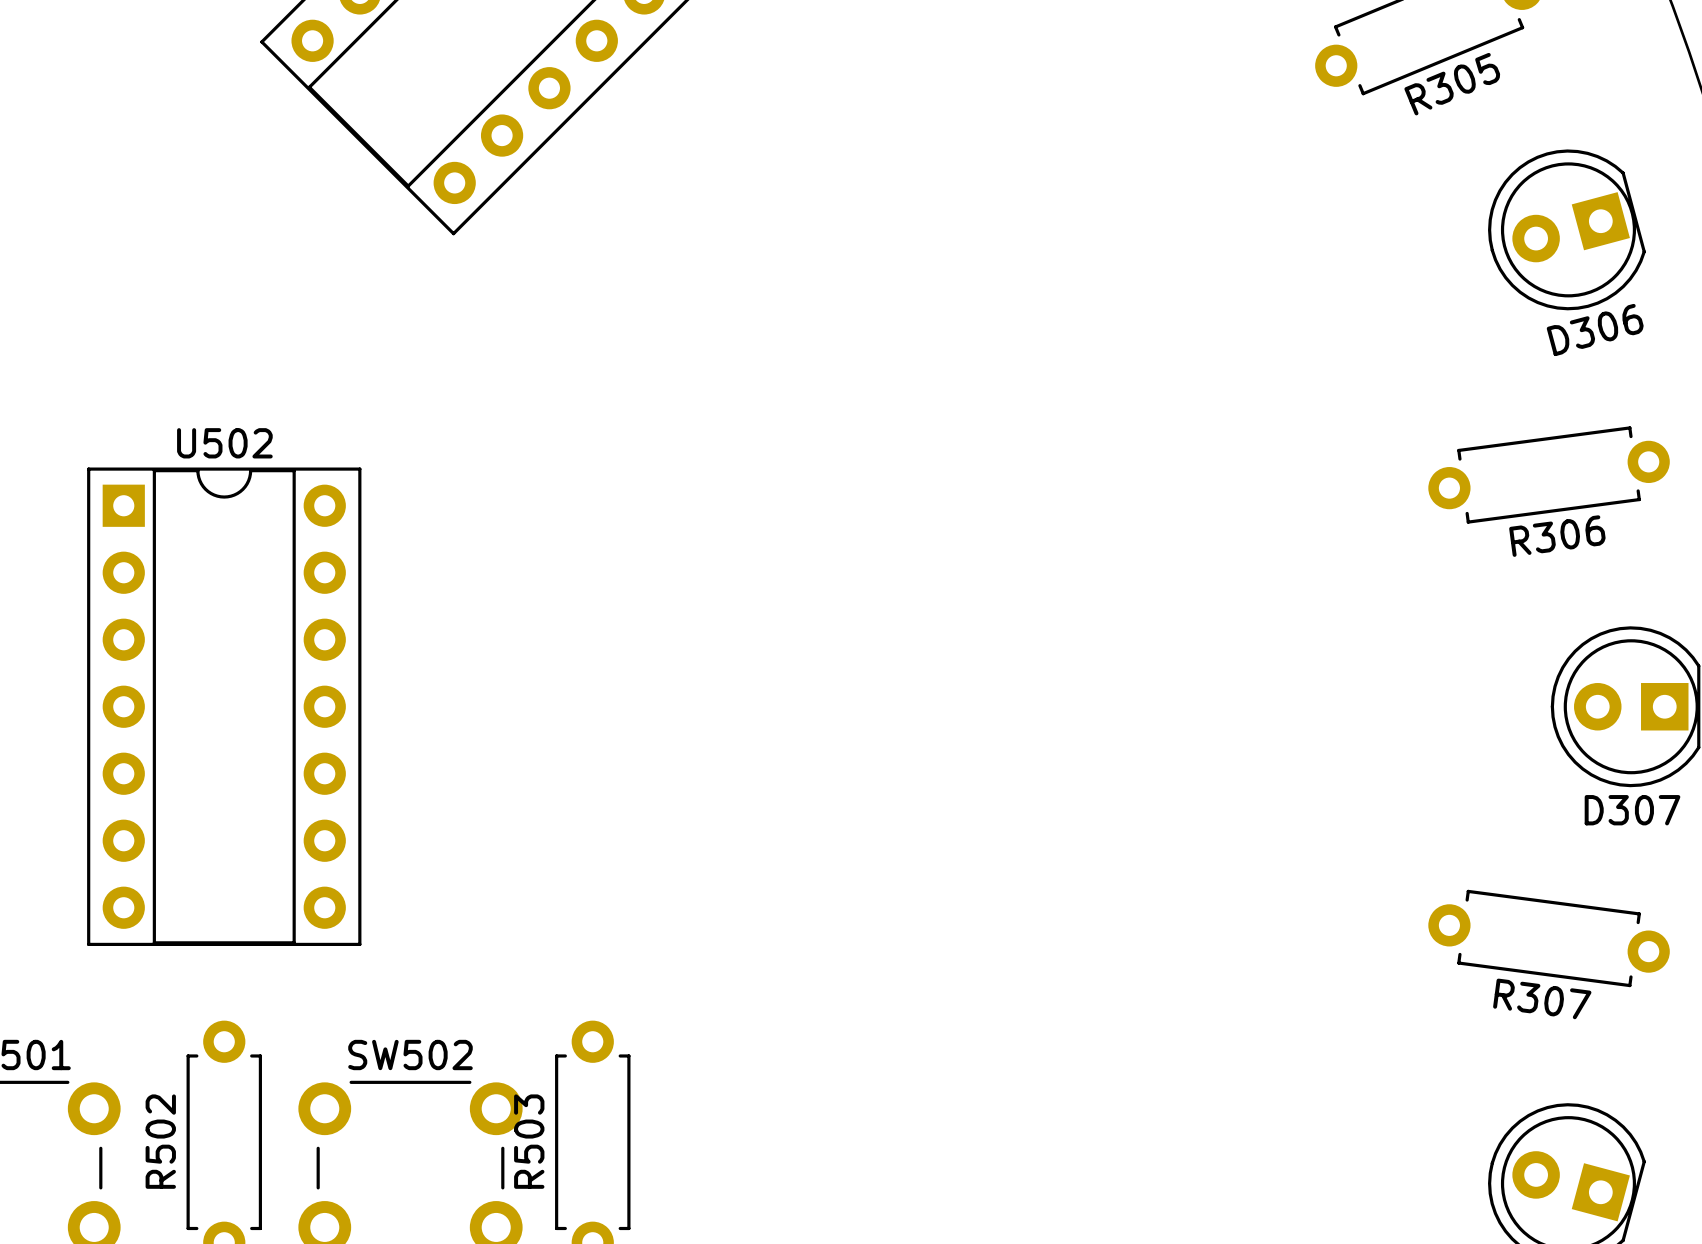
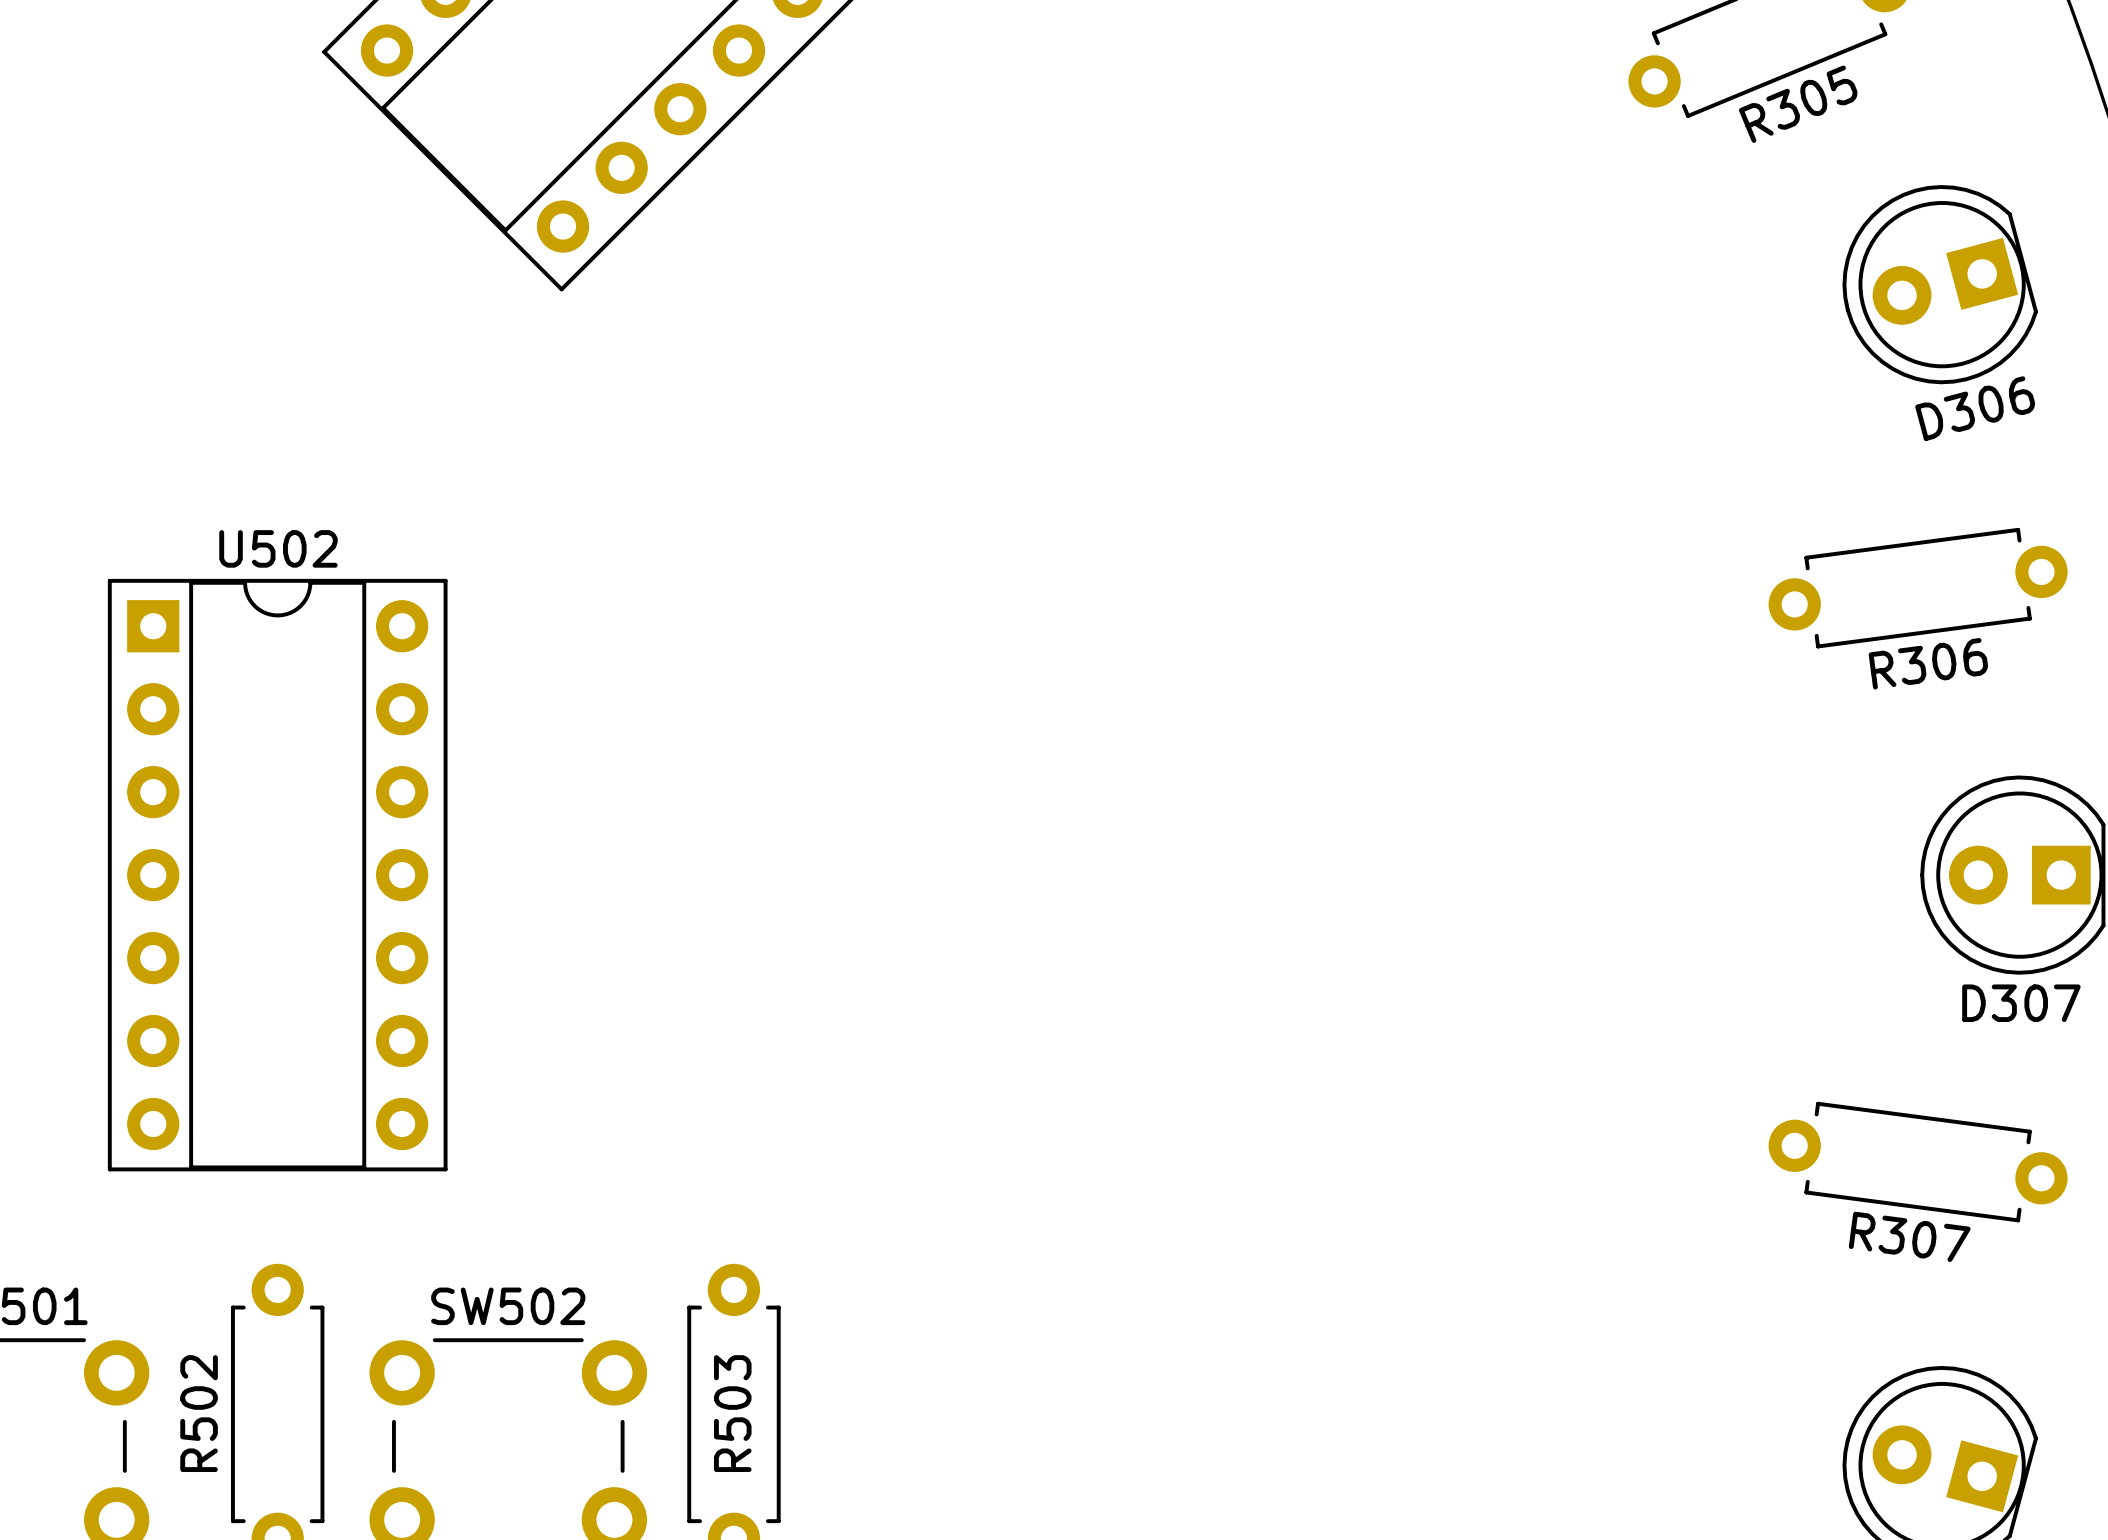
R503 name position: R503 (529, 1141) -> R503 (732, 1413)

